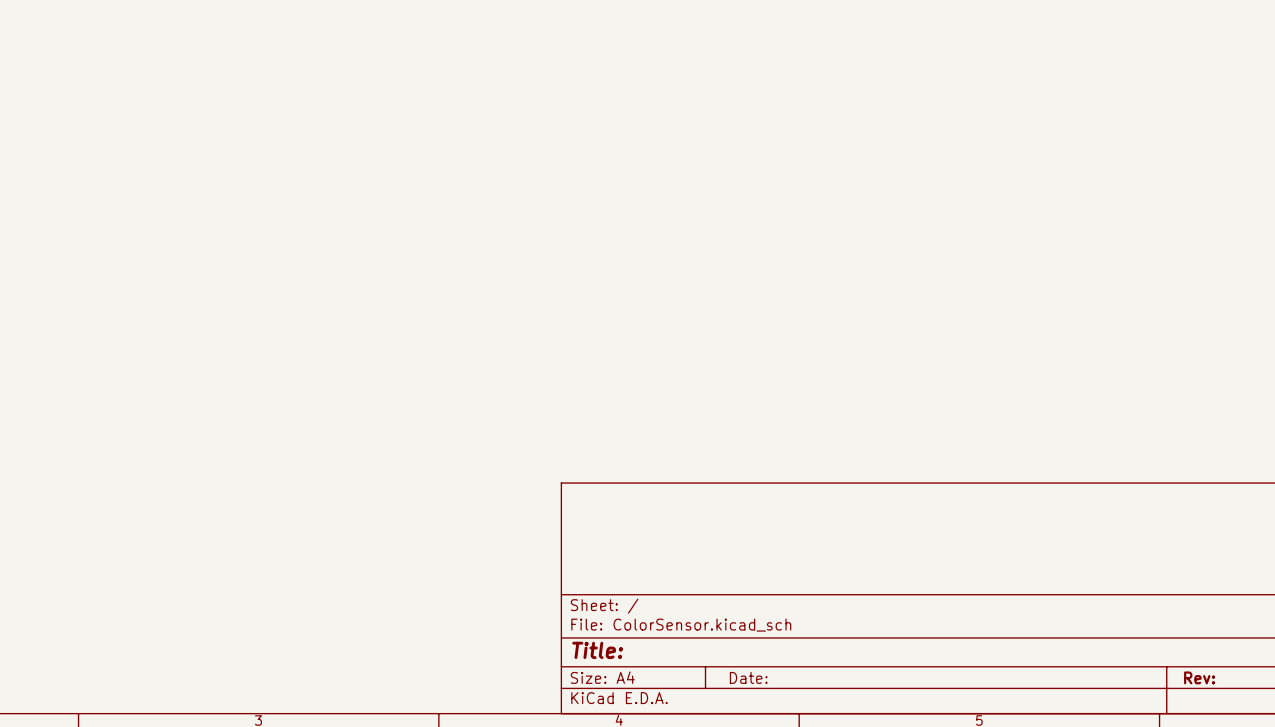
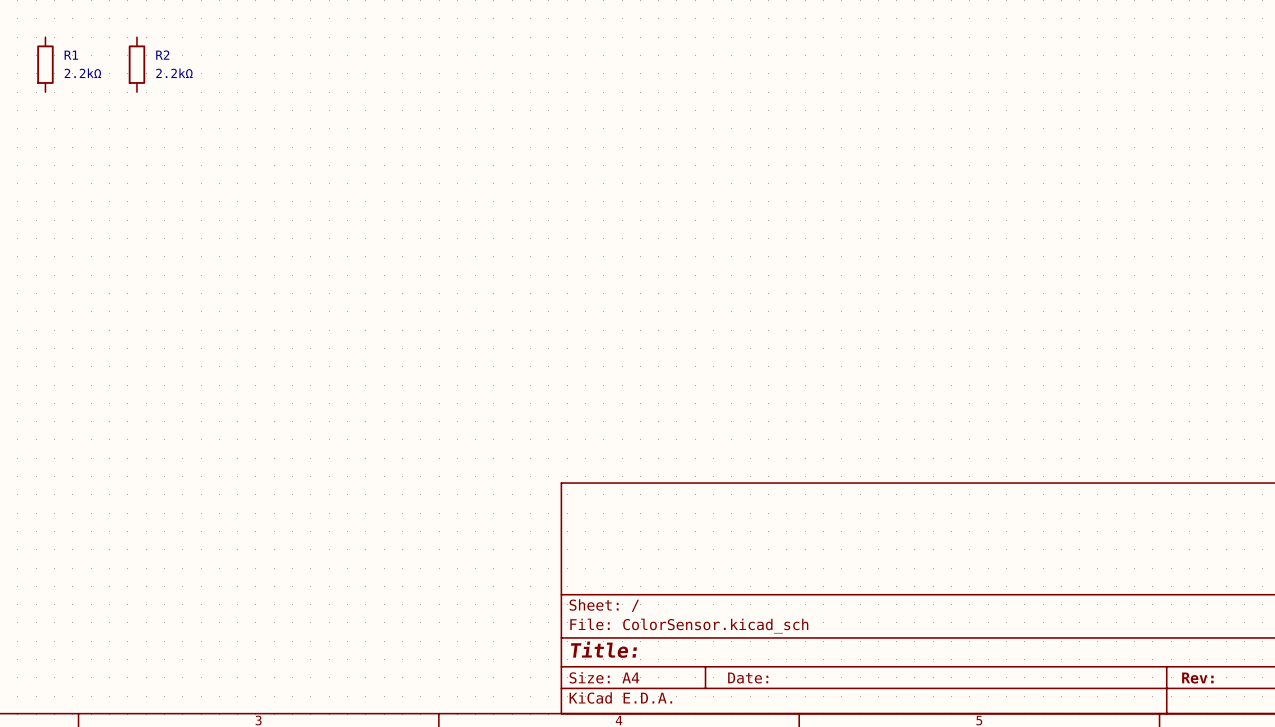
R1: none -> 2.2kΩ (45, 64)
R2: none -> 2.2kΩ (136, 64)

